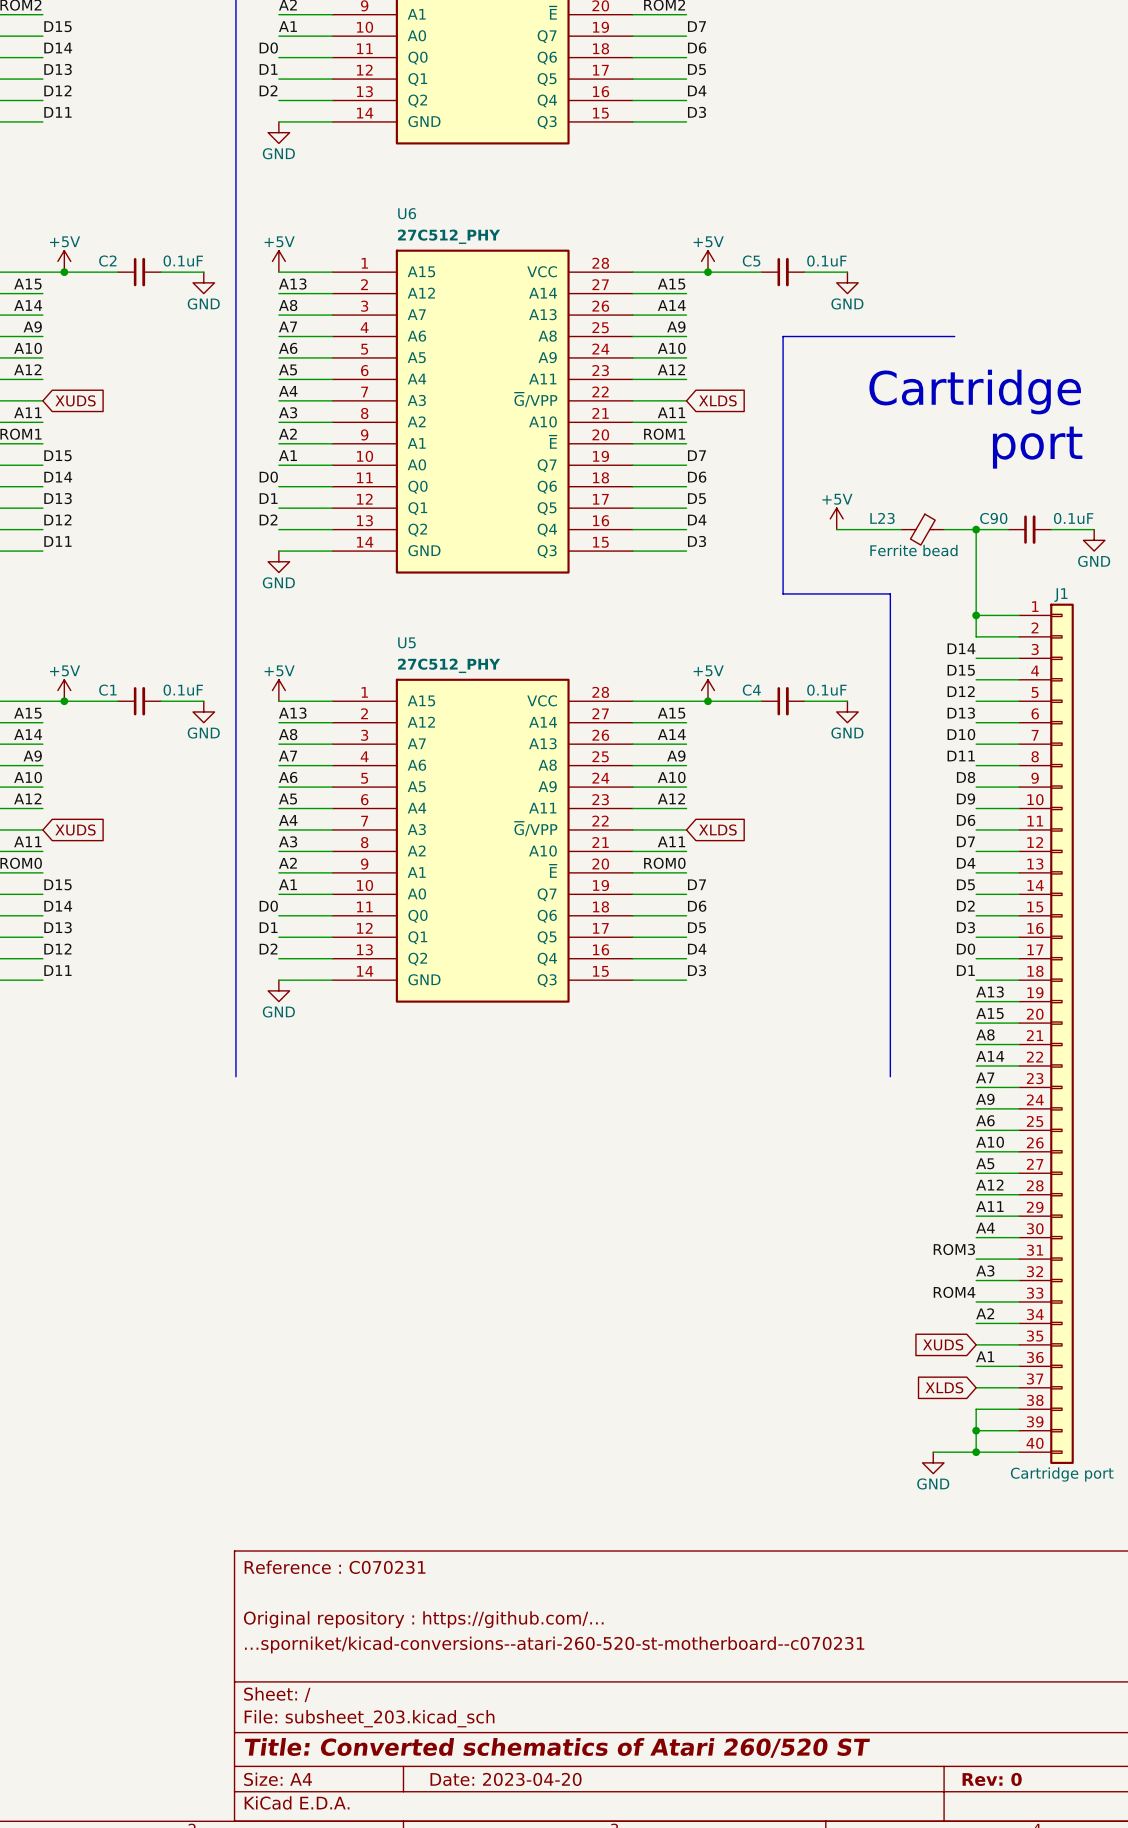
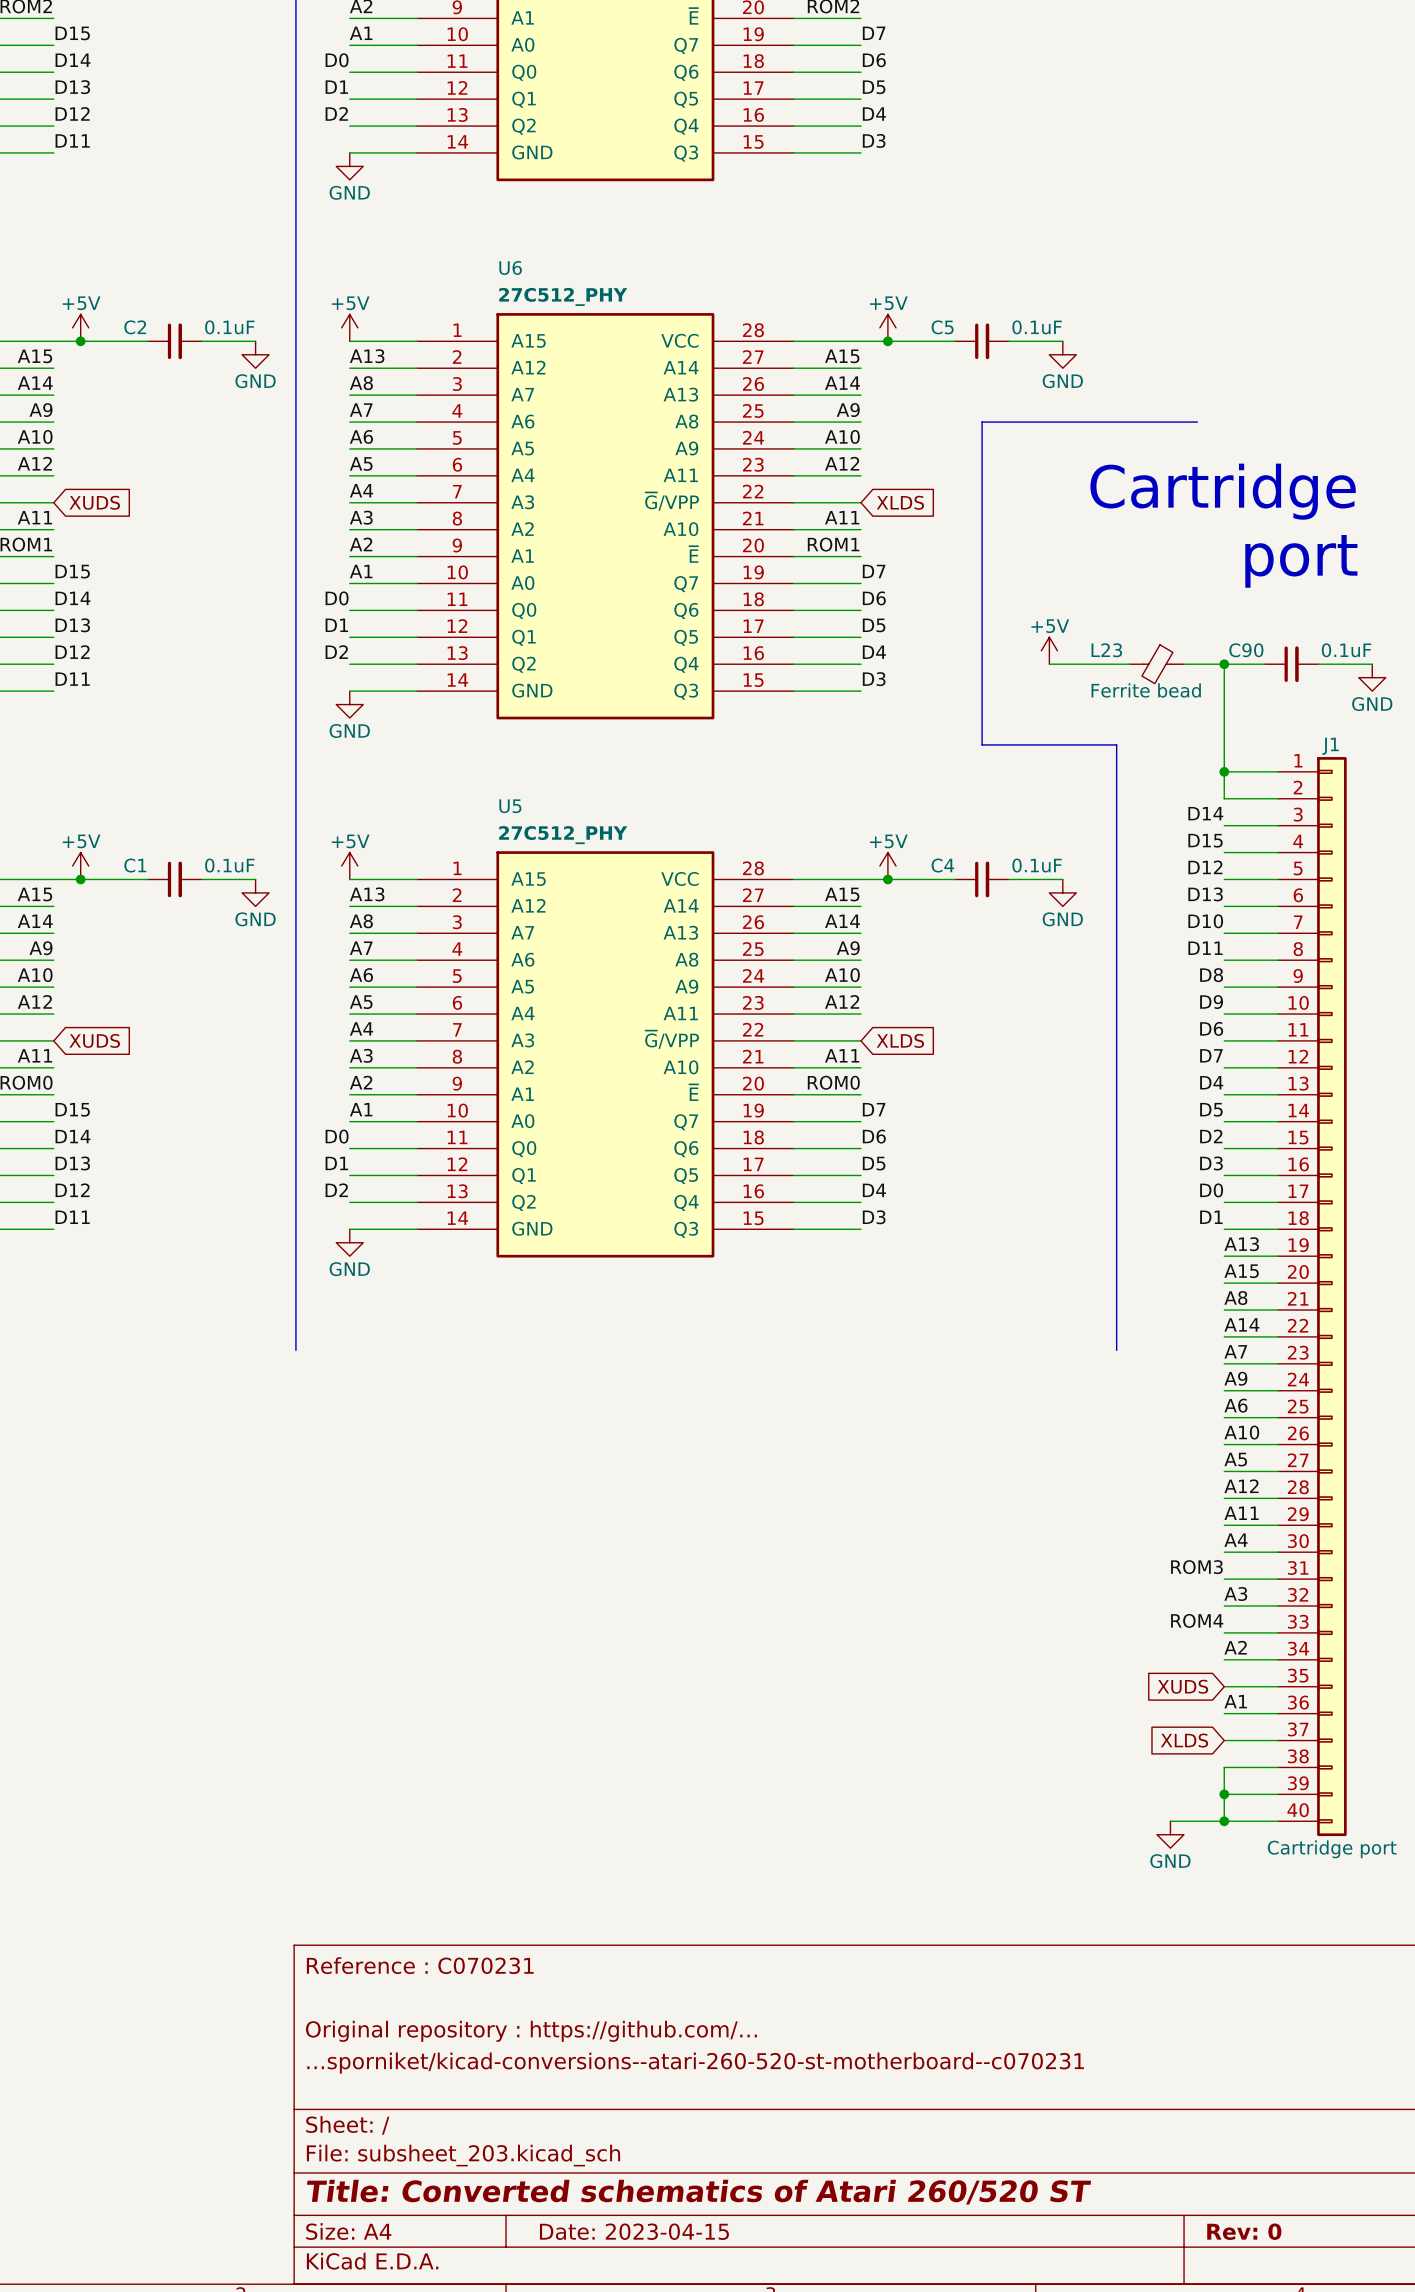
title block: Date: 2023-04-20 (506, 1779) -> Date: 2023-04-15 (634, 2231)

